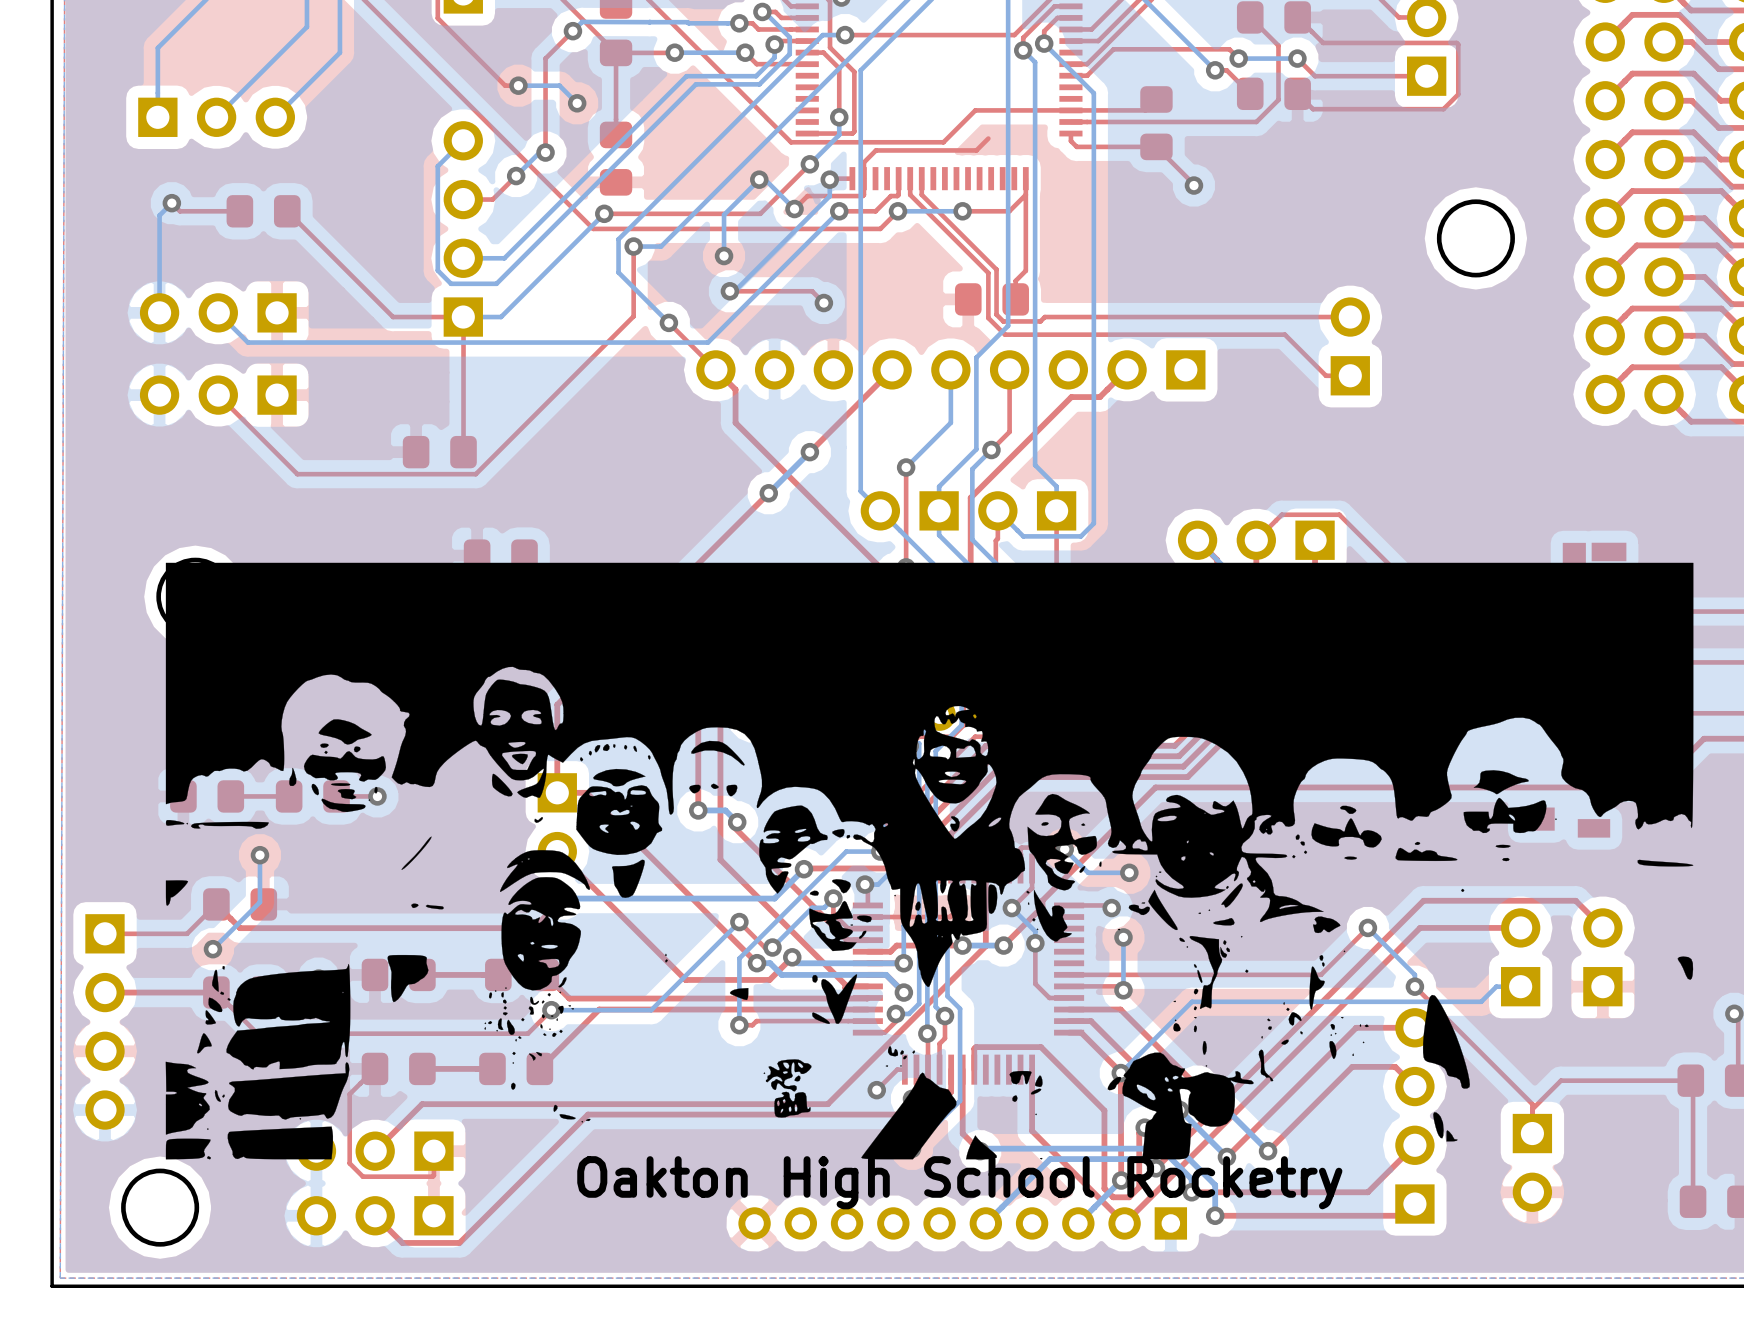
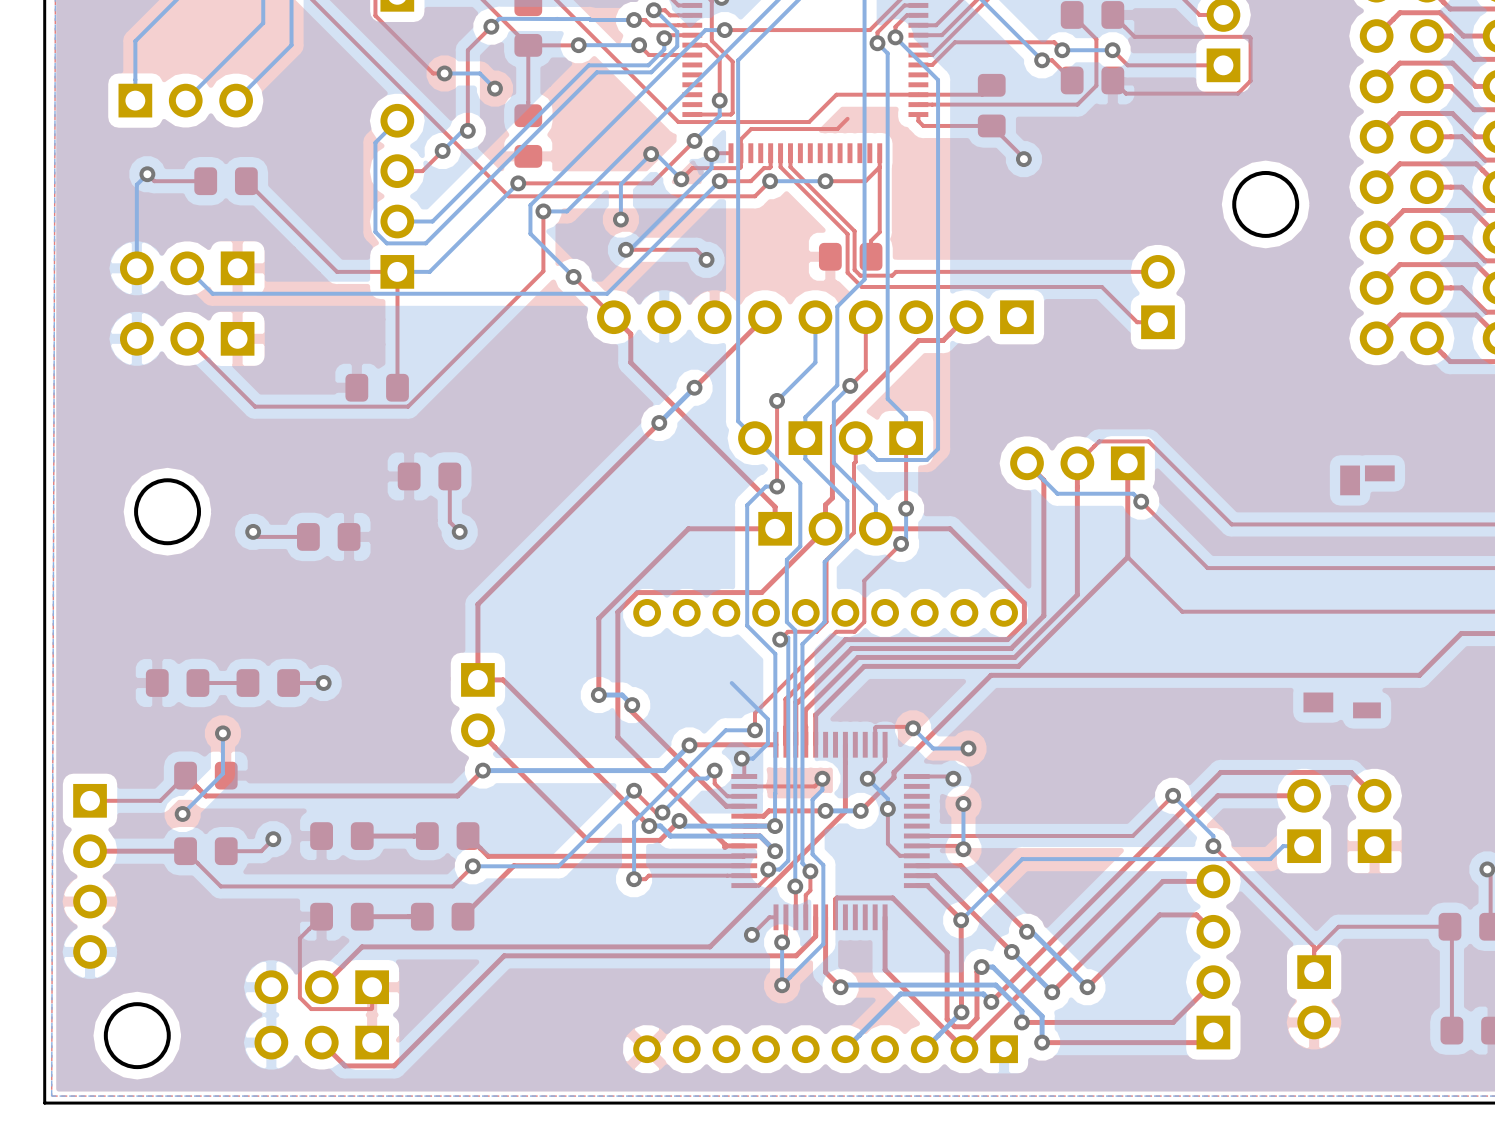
drawing: [165, 562, 1694, 1160] -> none
text: Oakton High School Rocketry (959, 1182) -> none

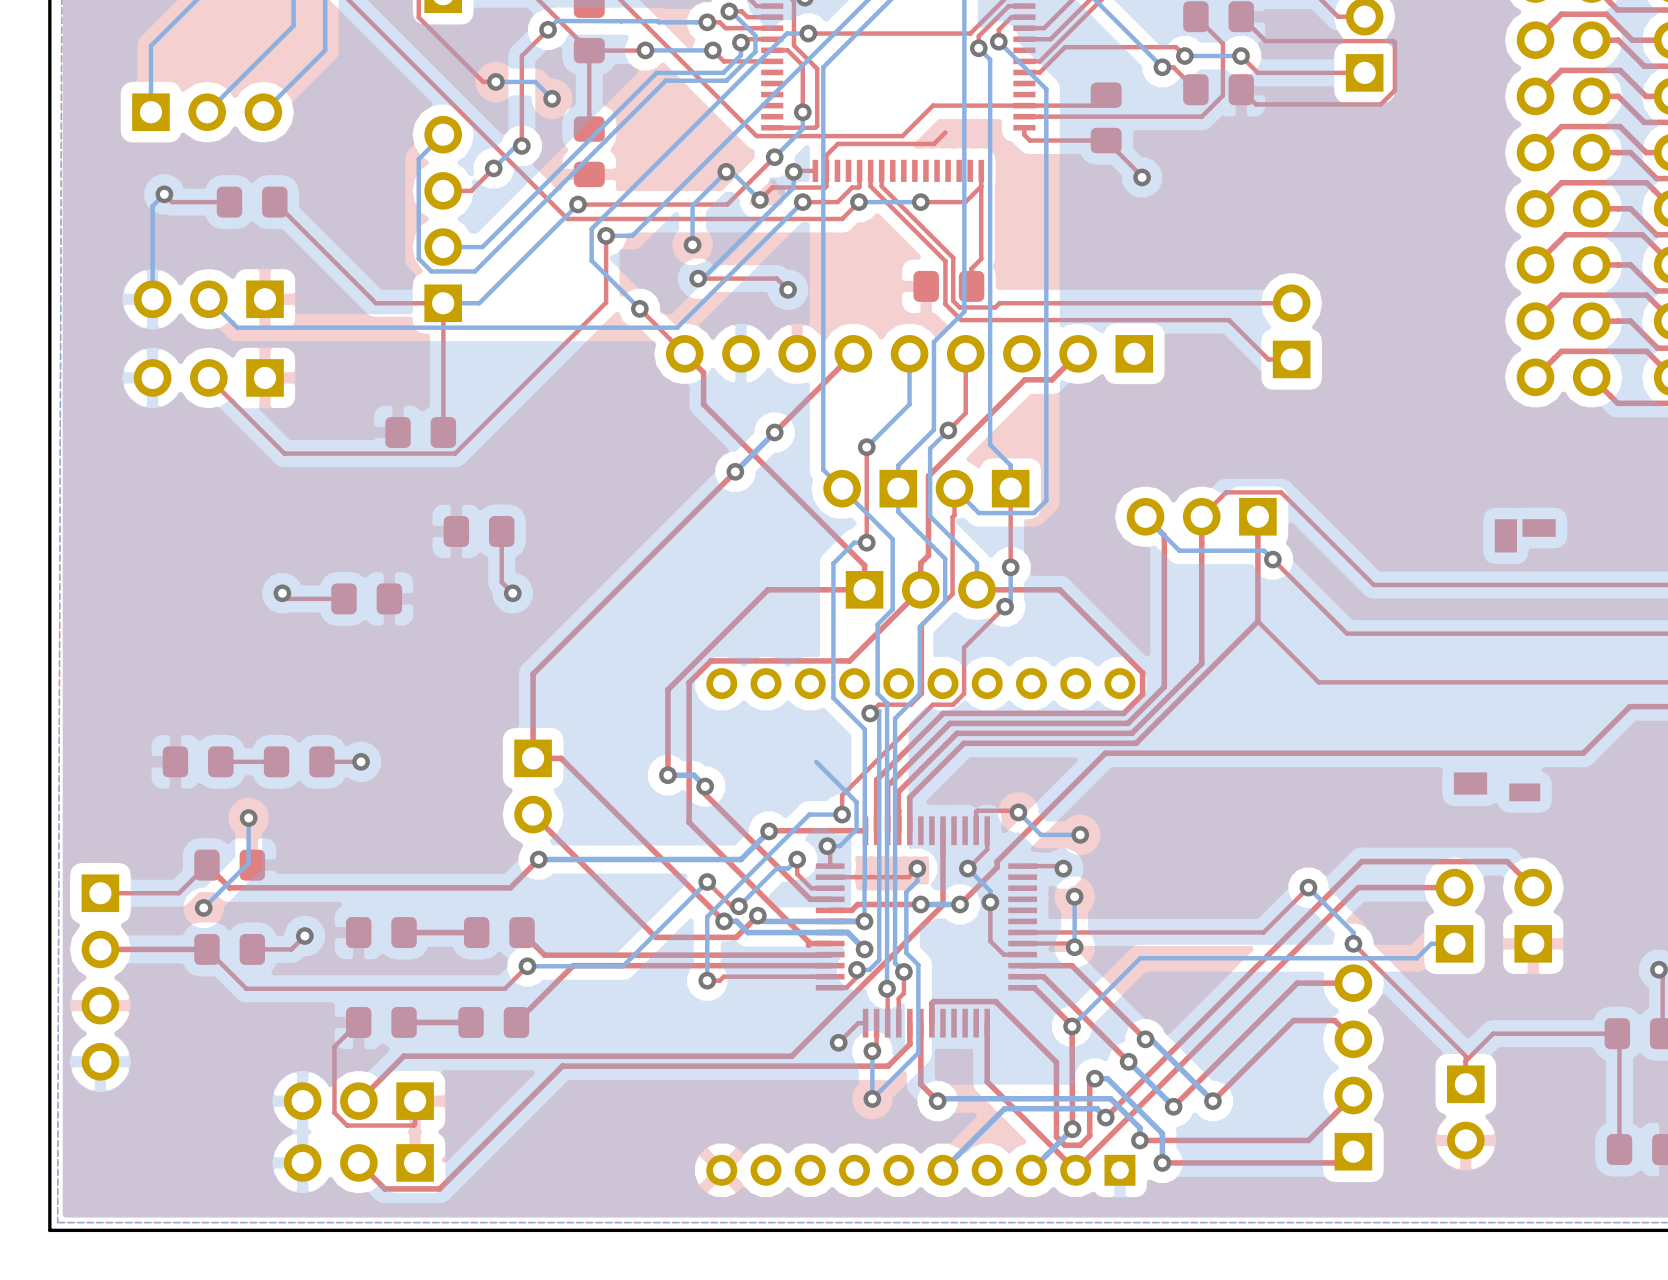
round board edge: [1232, 170, 1300, 238] -> none
round board edge: [134, 478, 202, 546] -> none
round board edge: [103, 1002, 171, 1070] -> none

